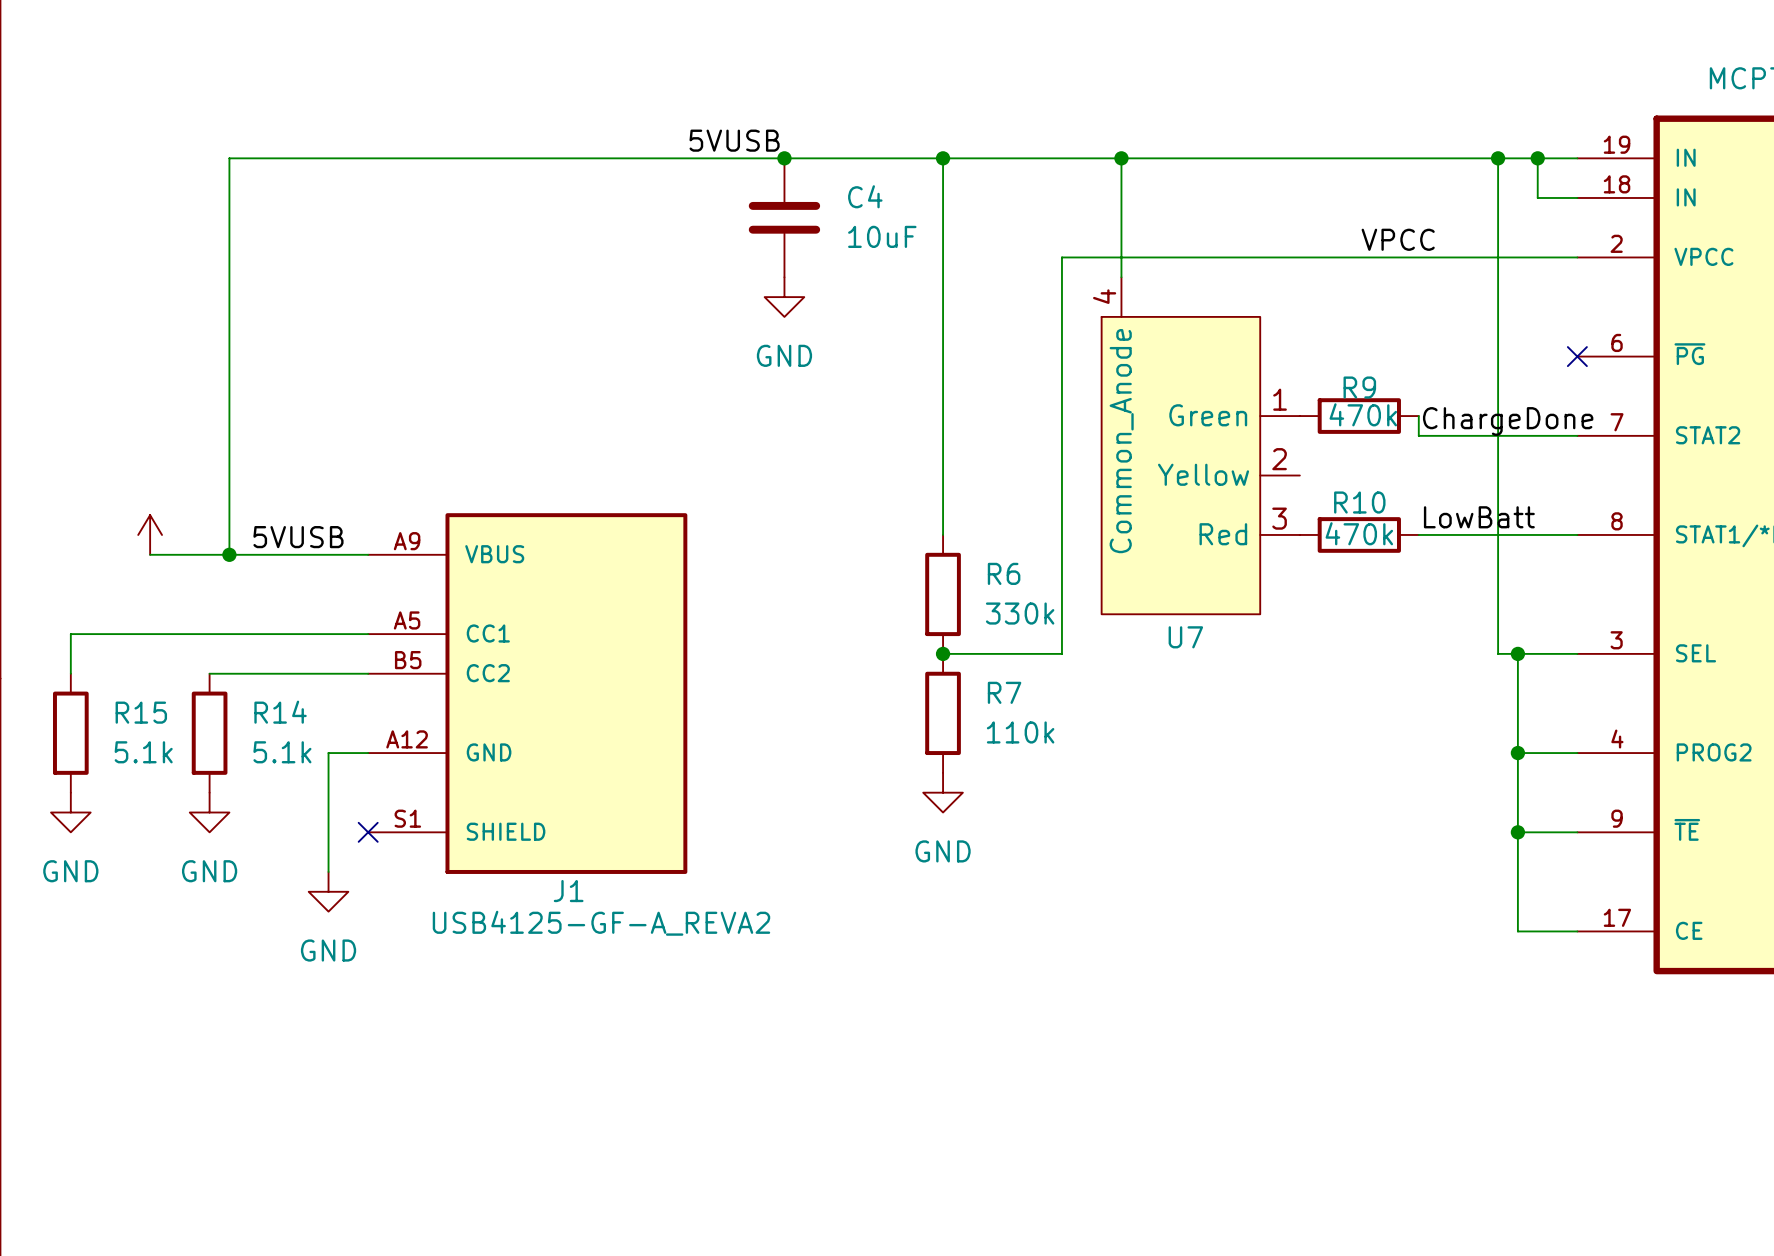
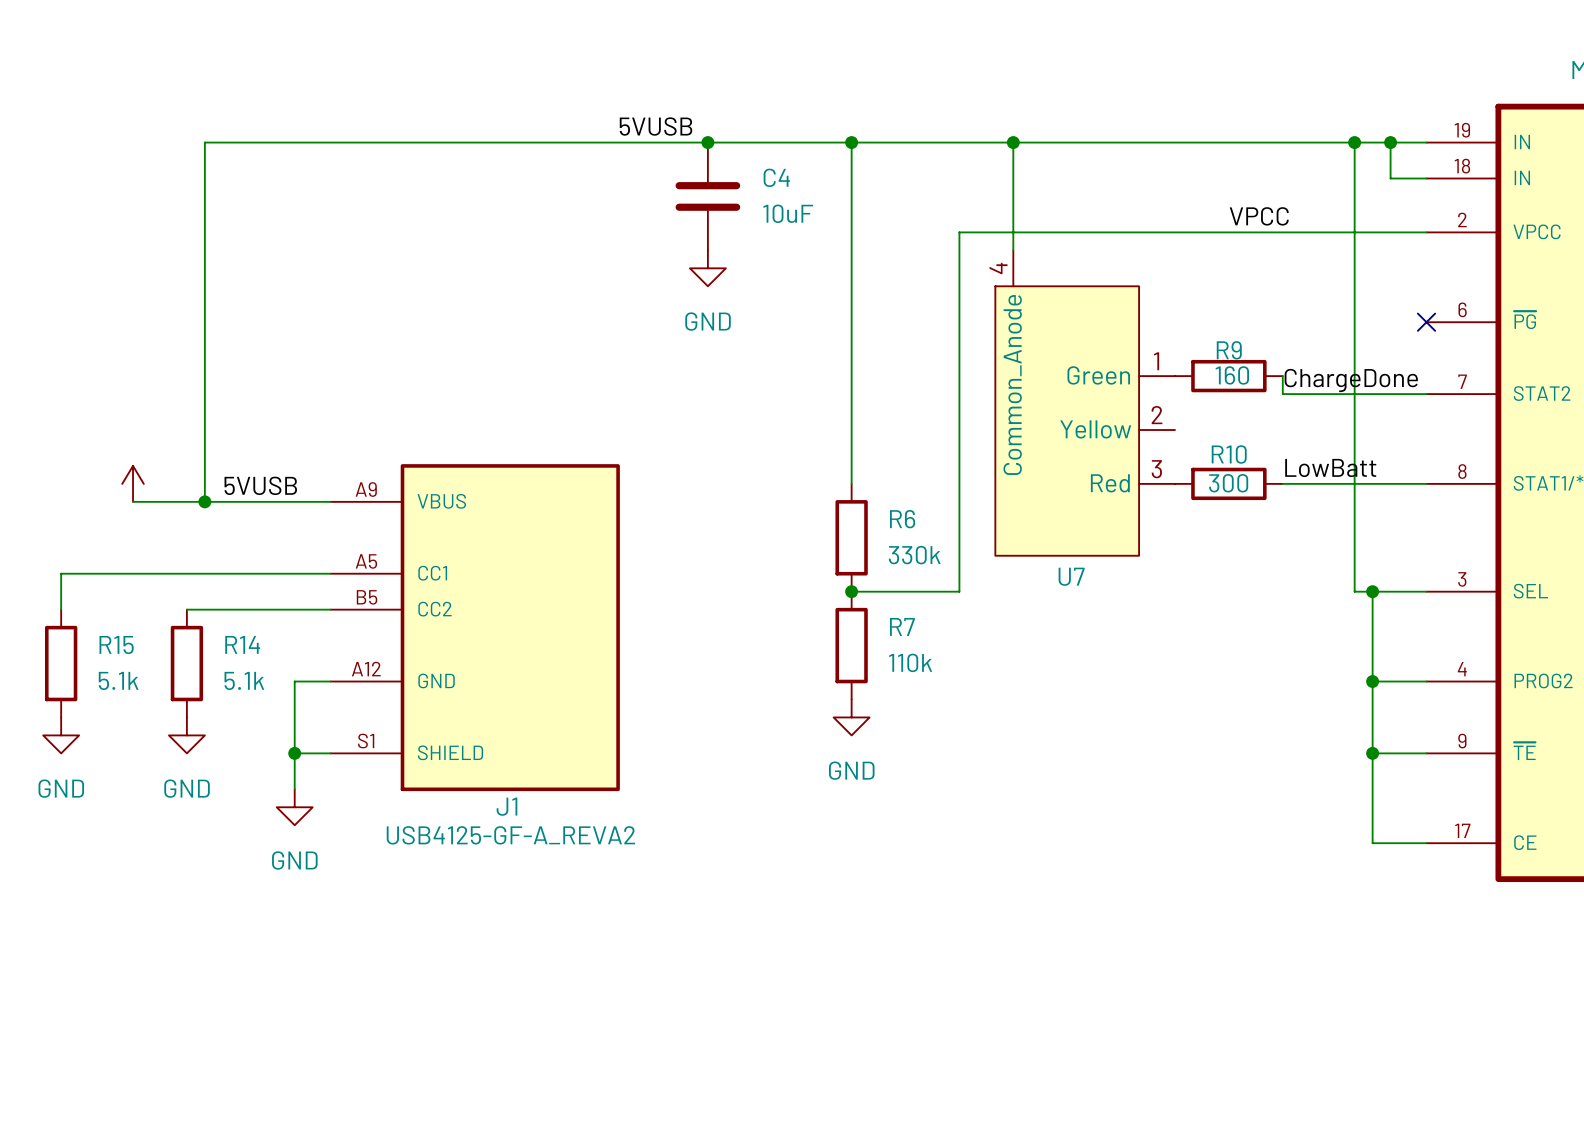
R9 value: 470k (1363, 414) -> 160 (1232, 375)
R10 value: 470k (1359, 533) -> 300 (1228, 483)
wire: none -> (294, 753) (330, 753)
junction: none -> (294, 753)
no-connect mark: (368, 832) -> none

